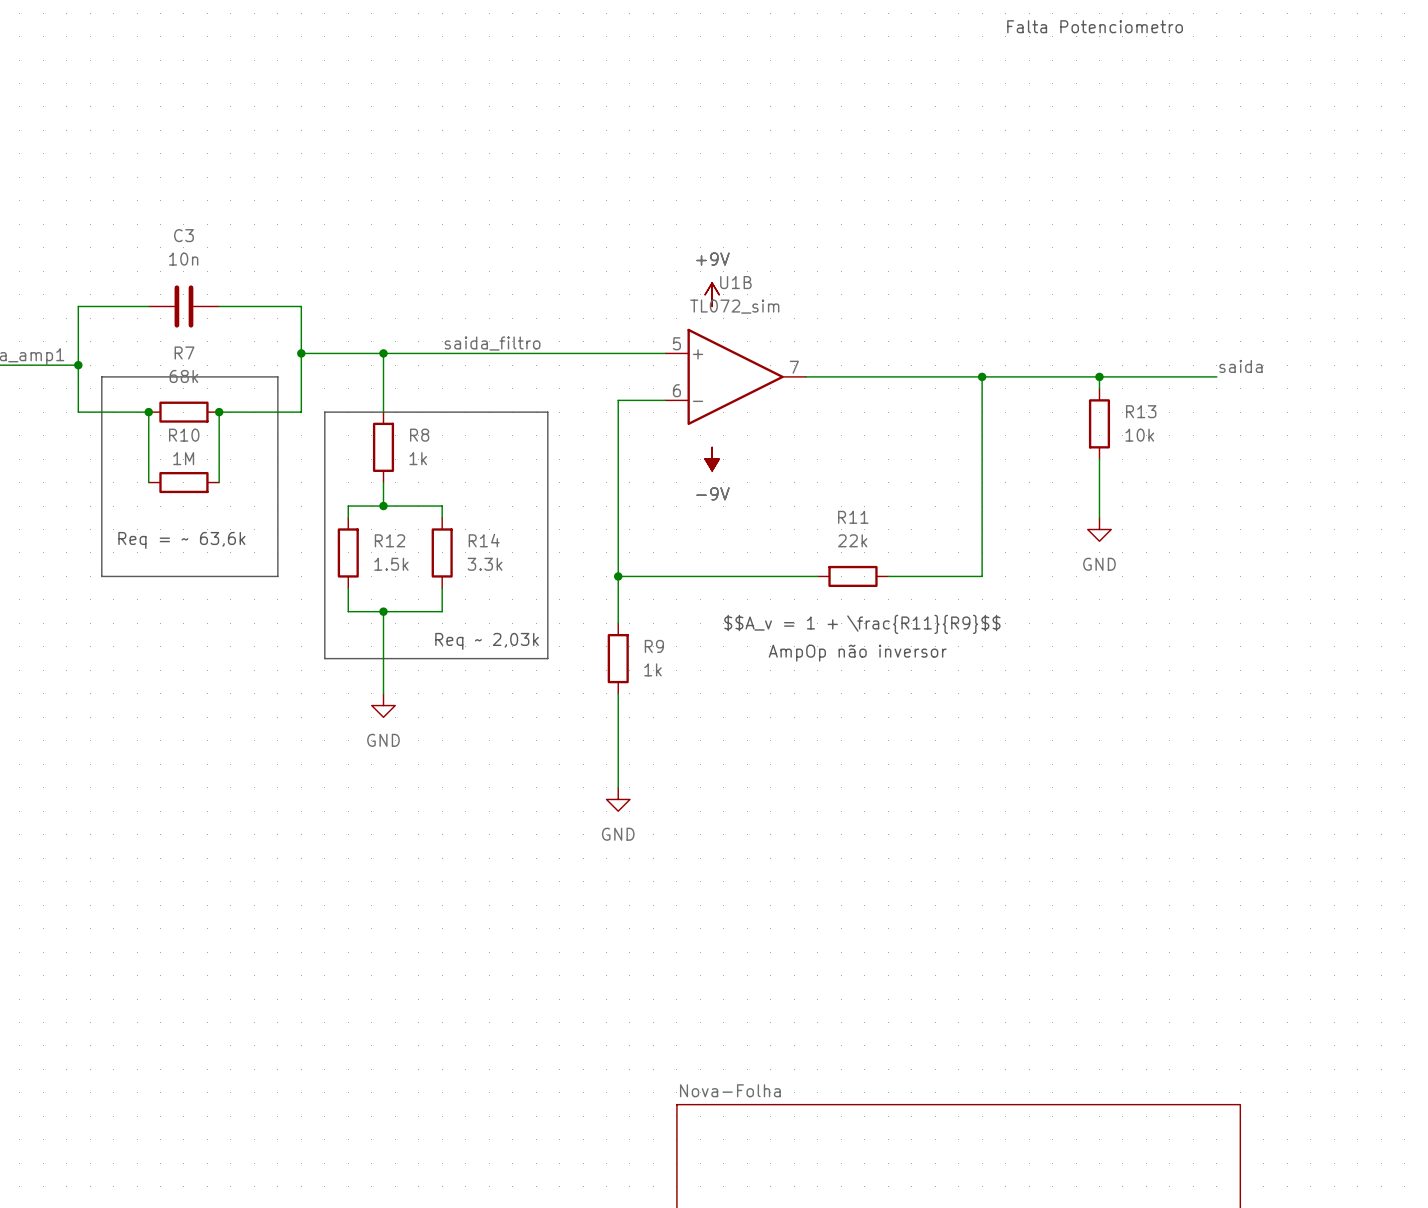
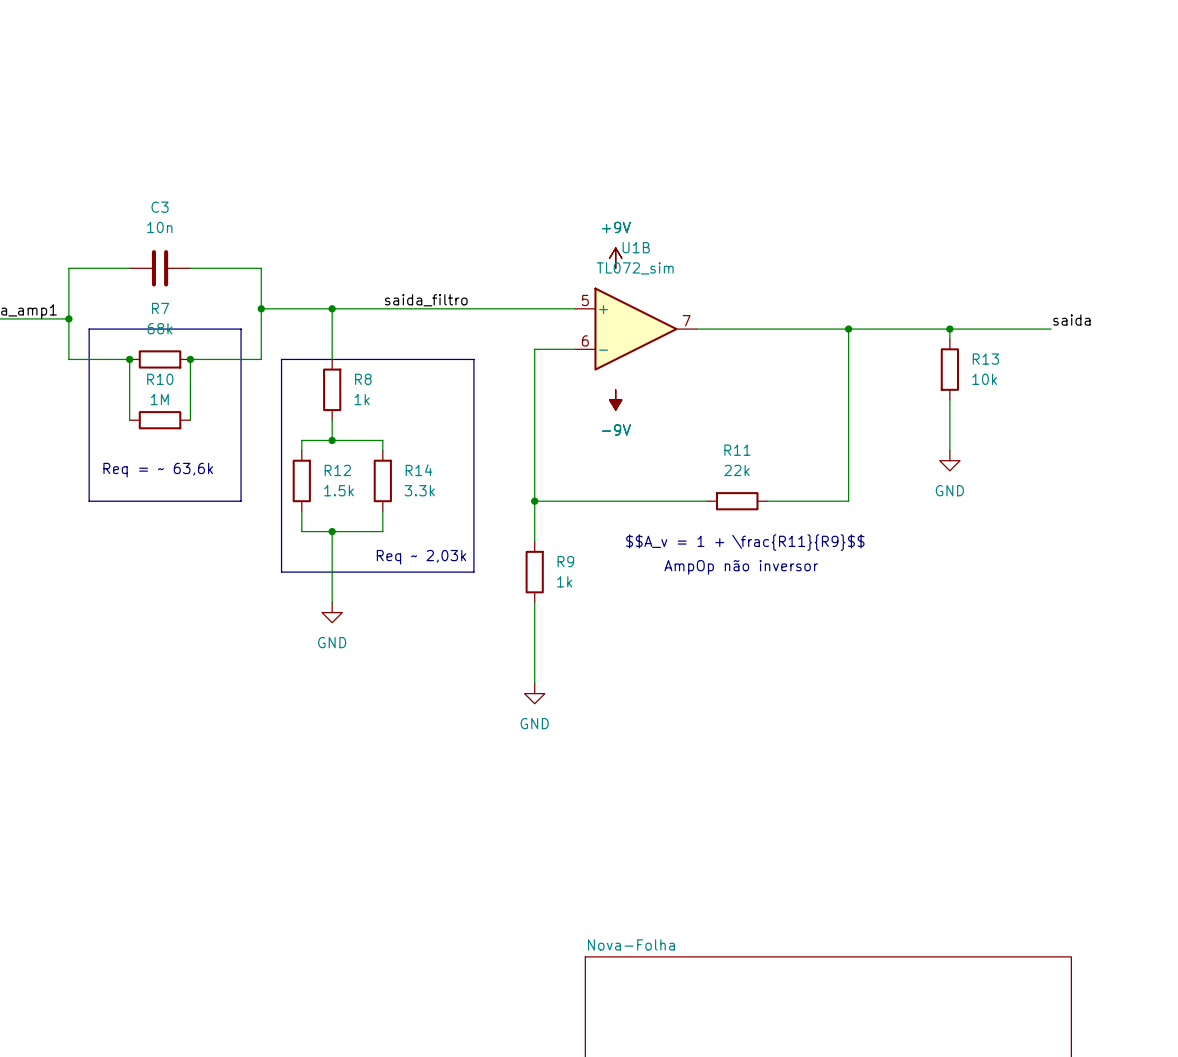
text: Falta Potenciometro (1095, 26) -> none

